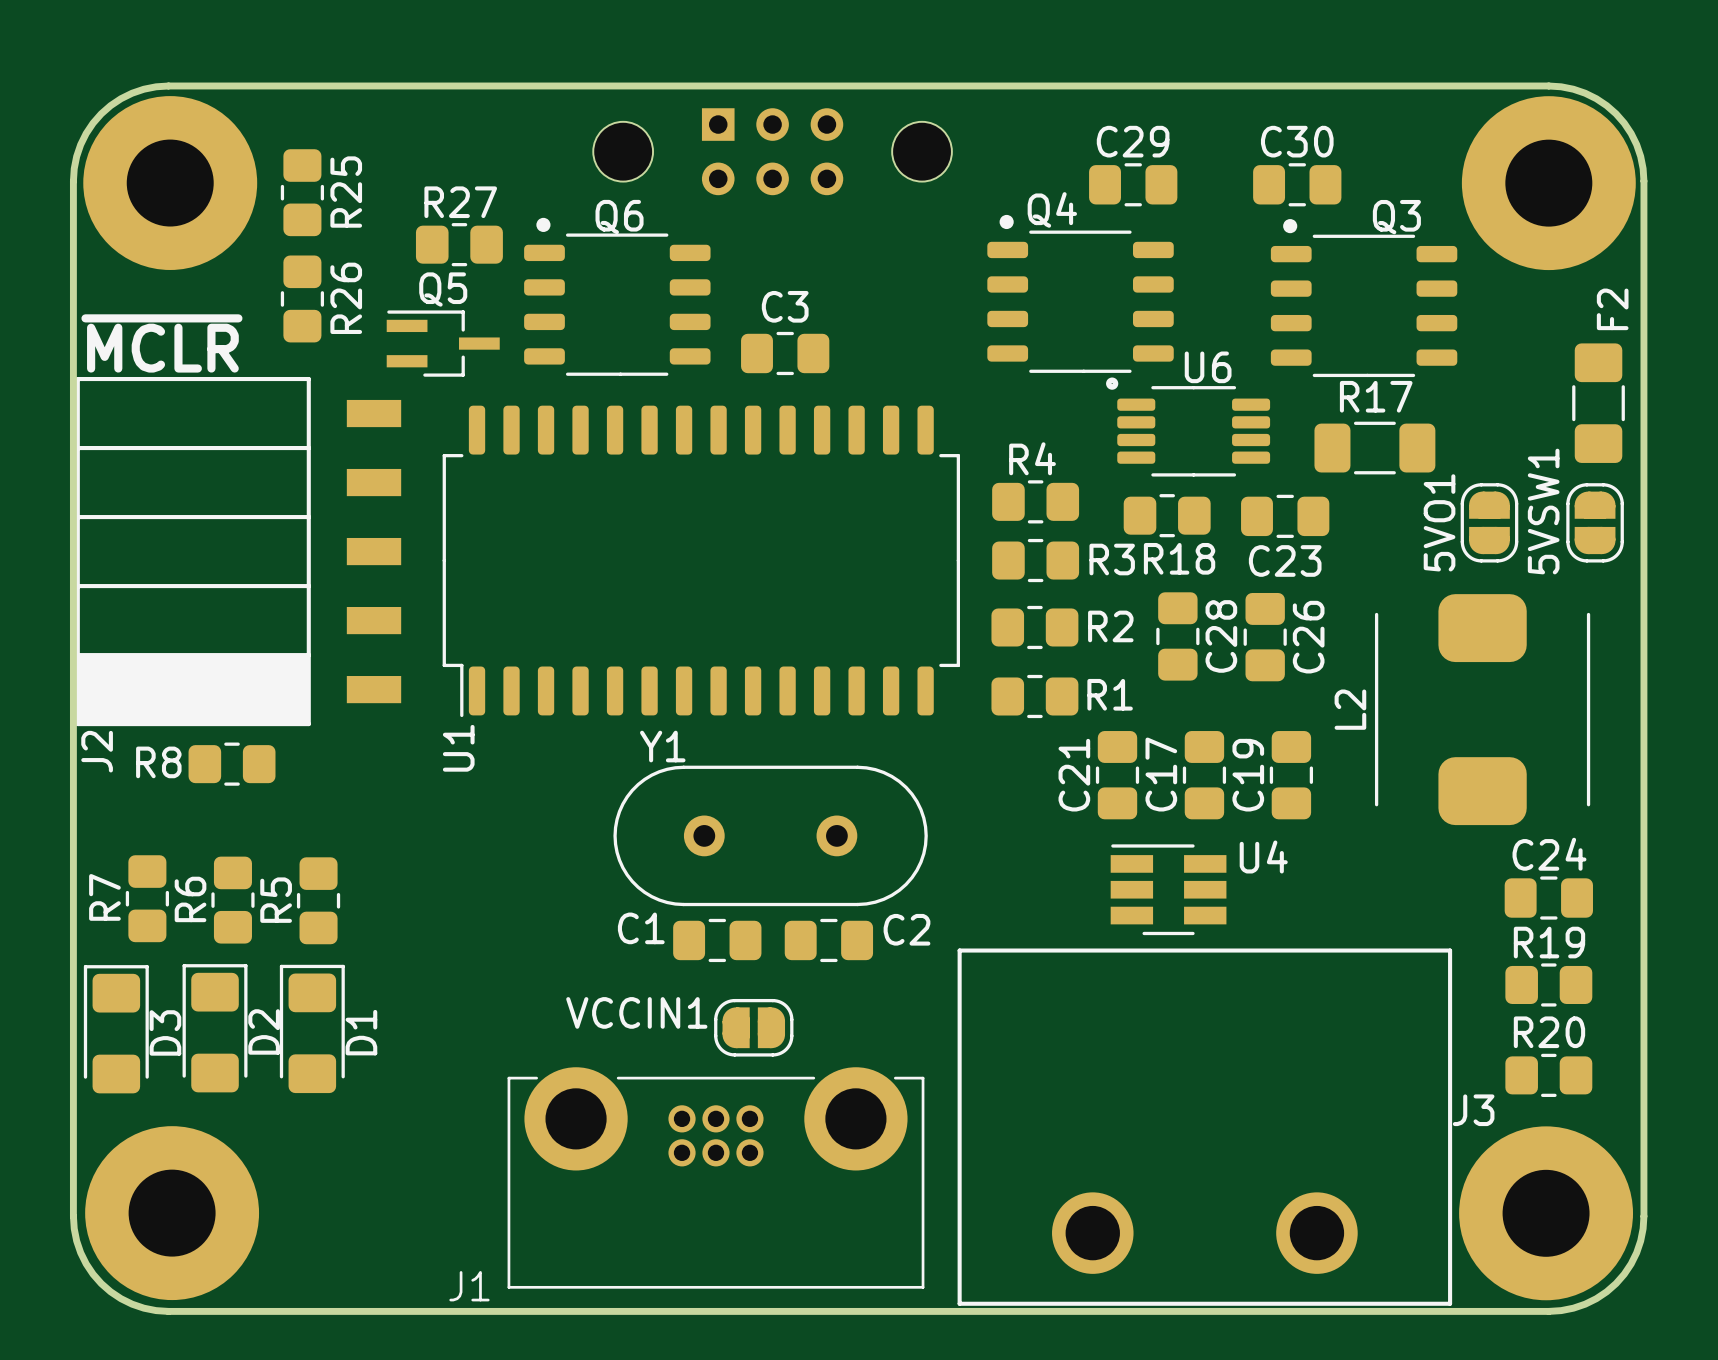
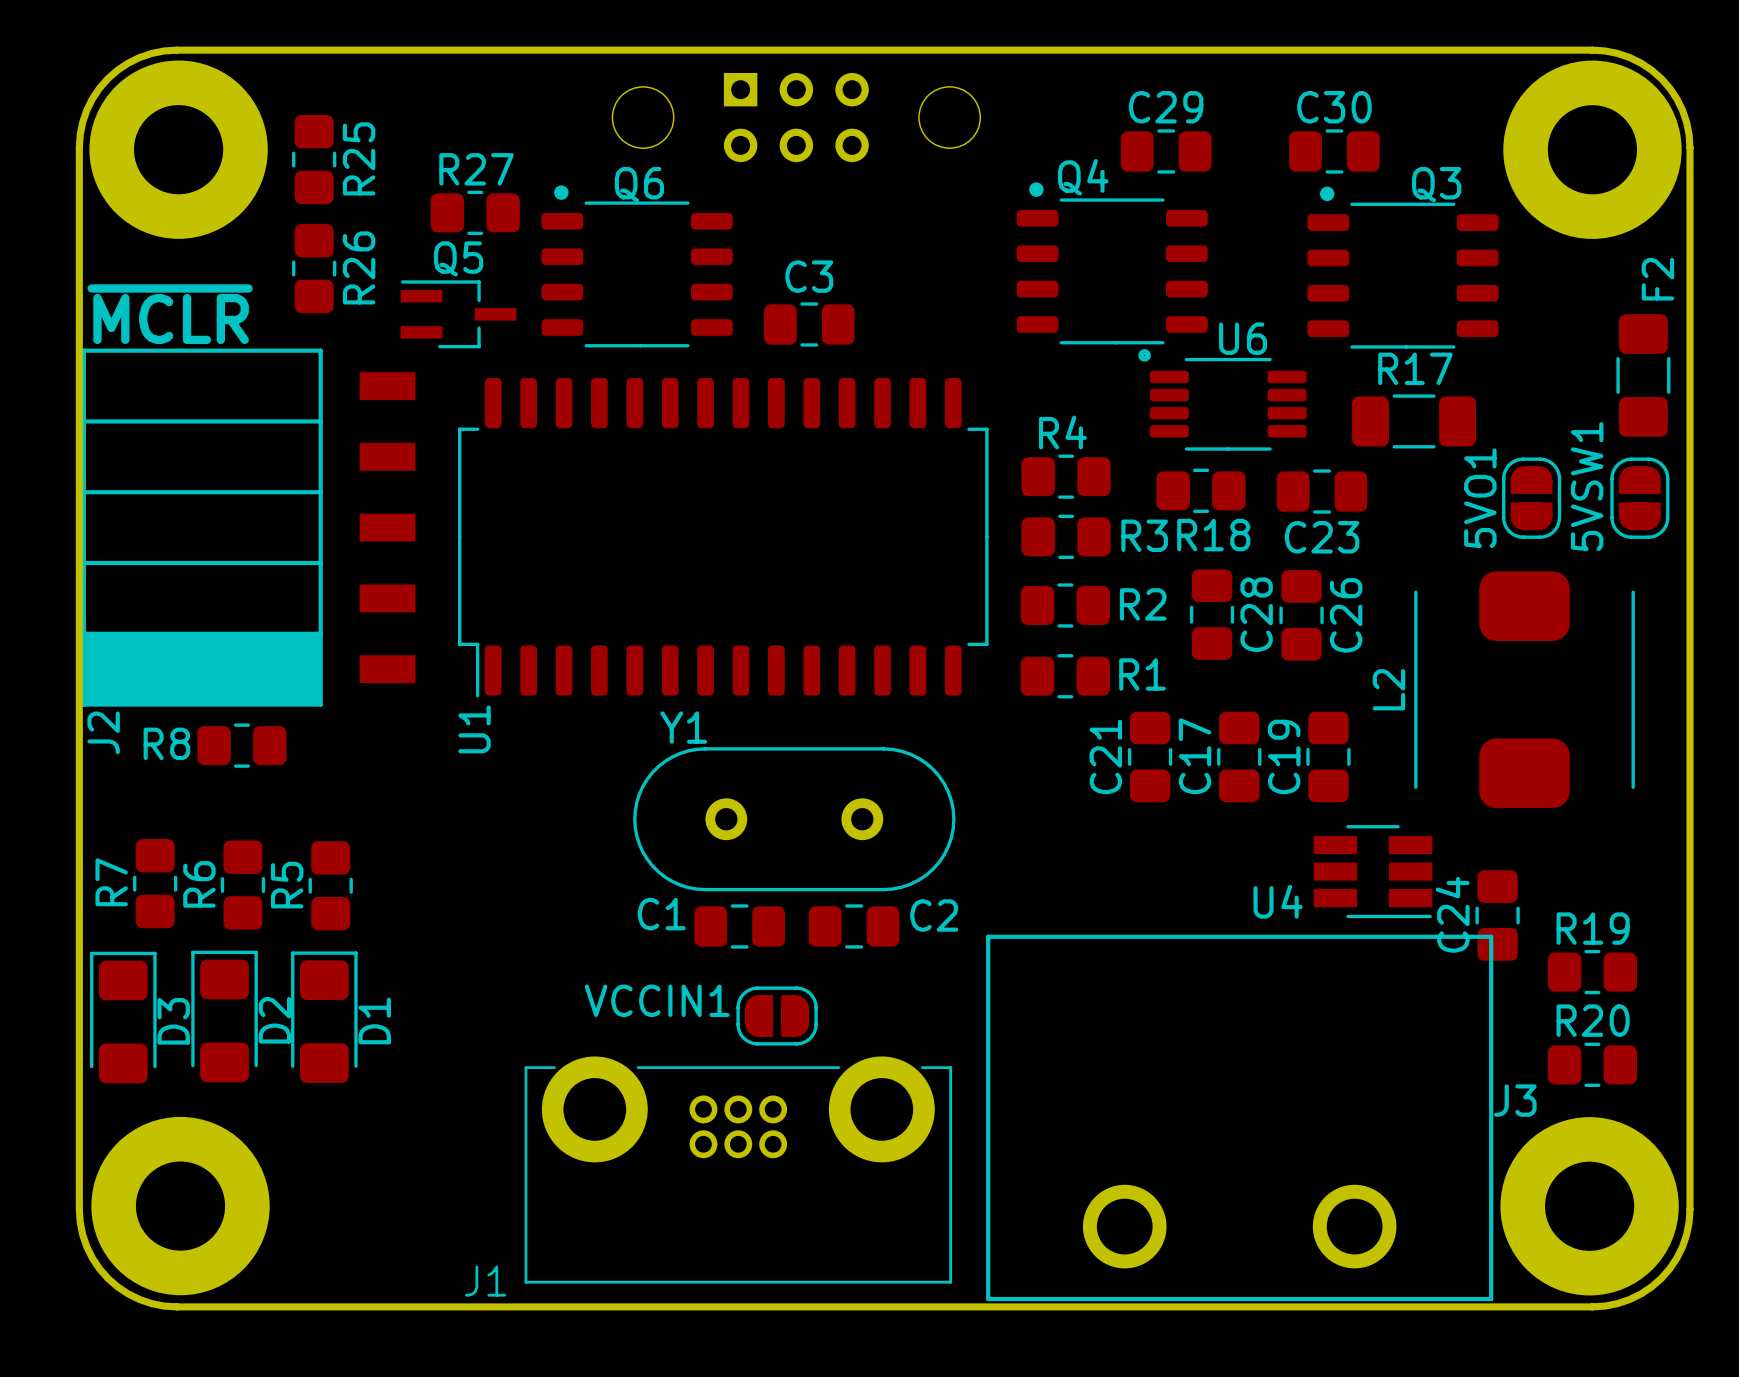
C24 name position: C24 (1549, 854) -> C24 (1452, 914)
U4 rotation: 0° (1168, 889) -> 180° (1373, 871)
U4 position: (1168, 889) -> (1373, 871)
C24 rotation: 0° (1548, 898) -> 90° clockwise (1497, 915)
C24 position: (1548, 898) -> (1497, 915)

